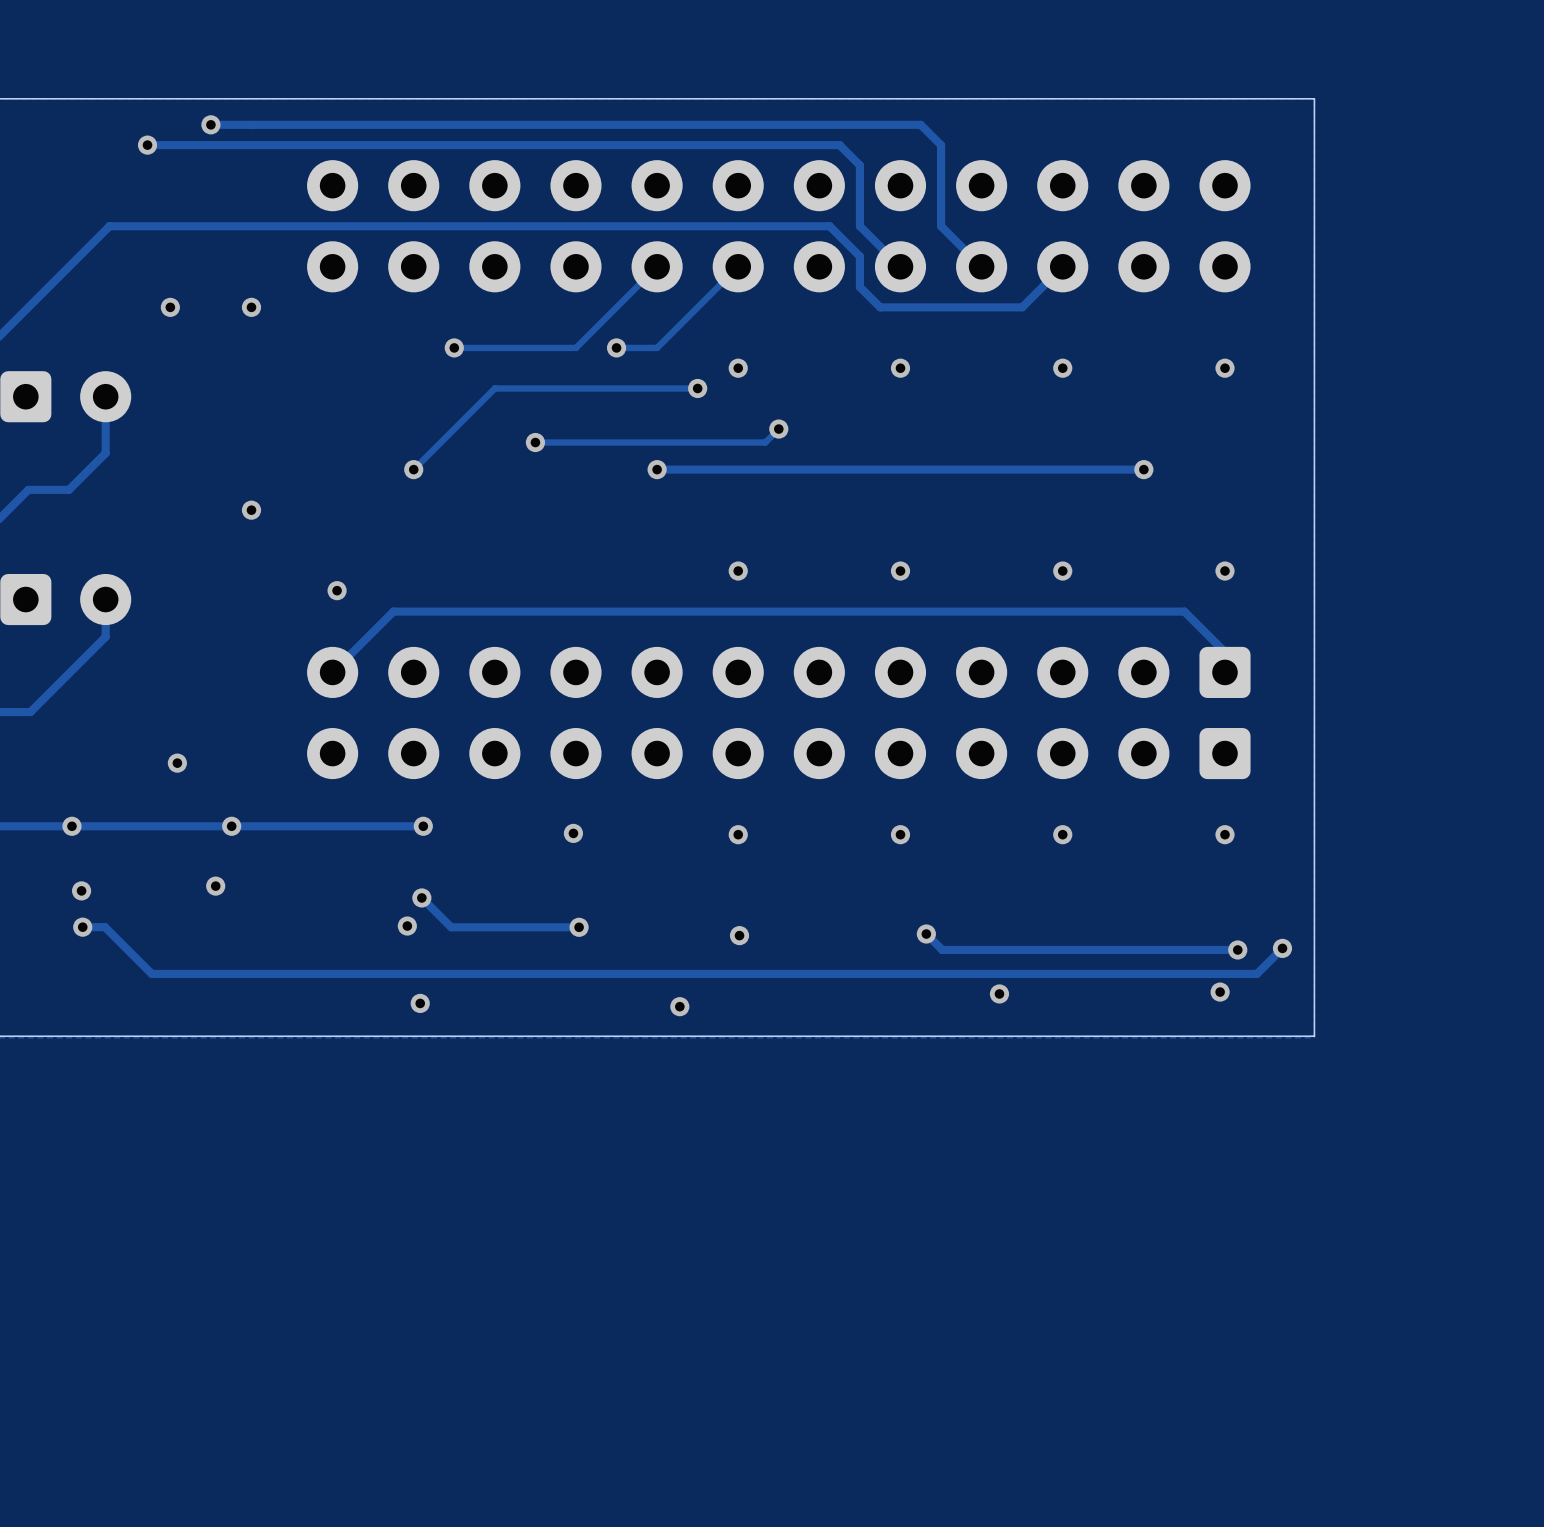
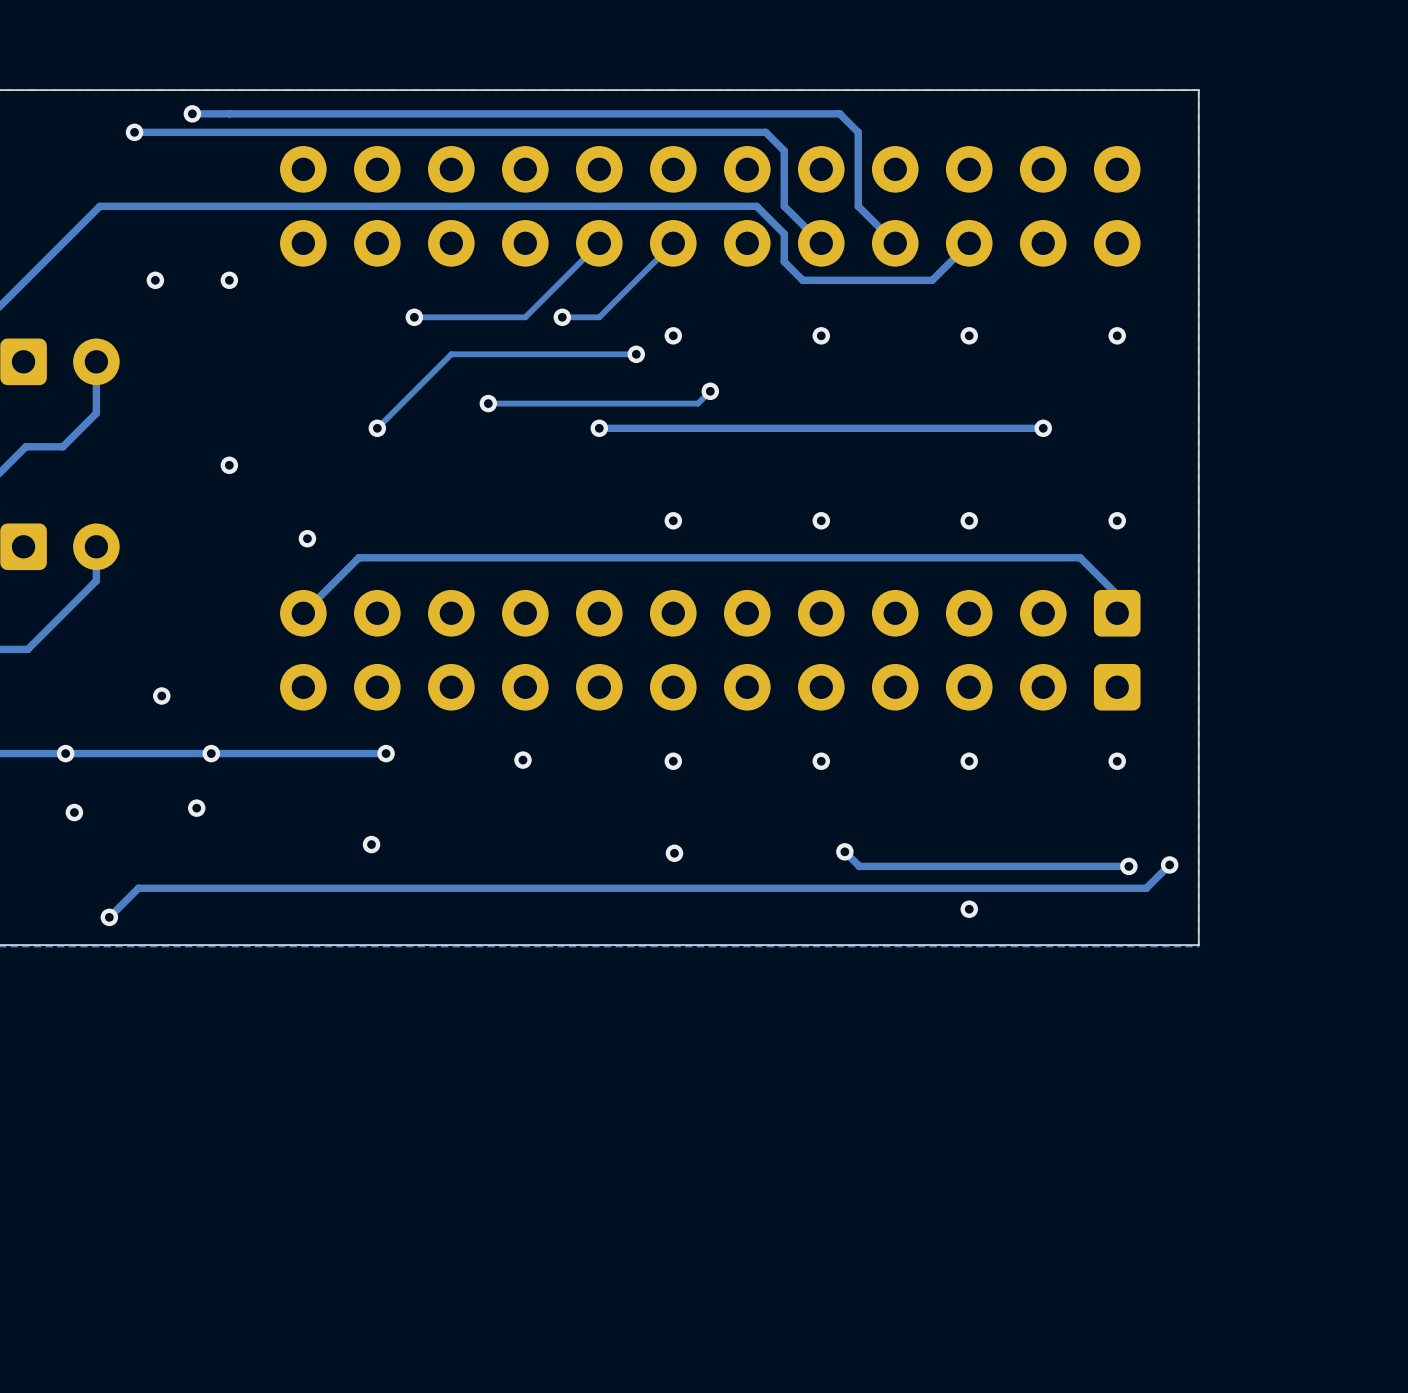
track: (421, 897) (451, 927) (579, 927) -> none
via: (421, 897) -> none
track: (82, 927) (105, 927) (151, 973) -> (109, 917) (138, 888)
via position: (82, 927) -> (109, 917)
via: (579, 927) -> none
via: (1220, 992) -> none
via position: (999, 993) -> (969, 909)
via: (420, 1003) -> none
via: (679, 1006) -> none

